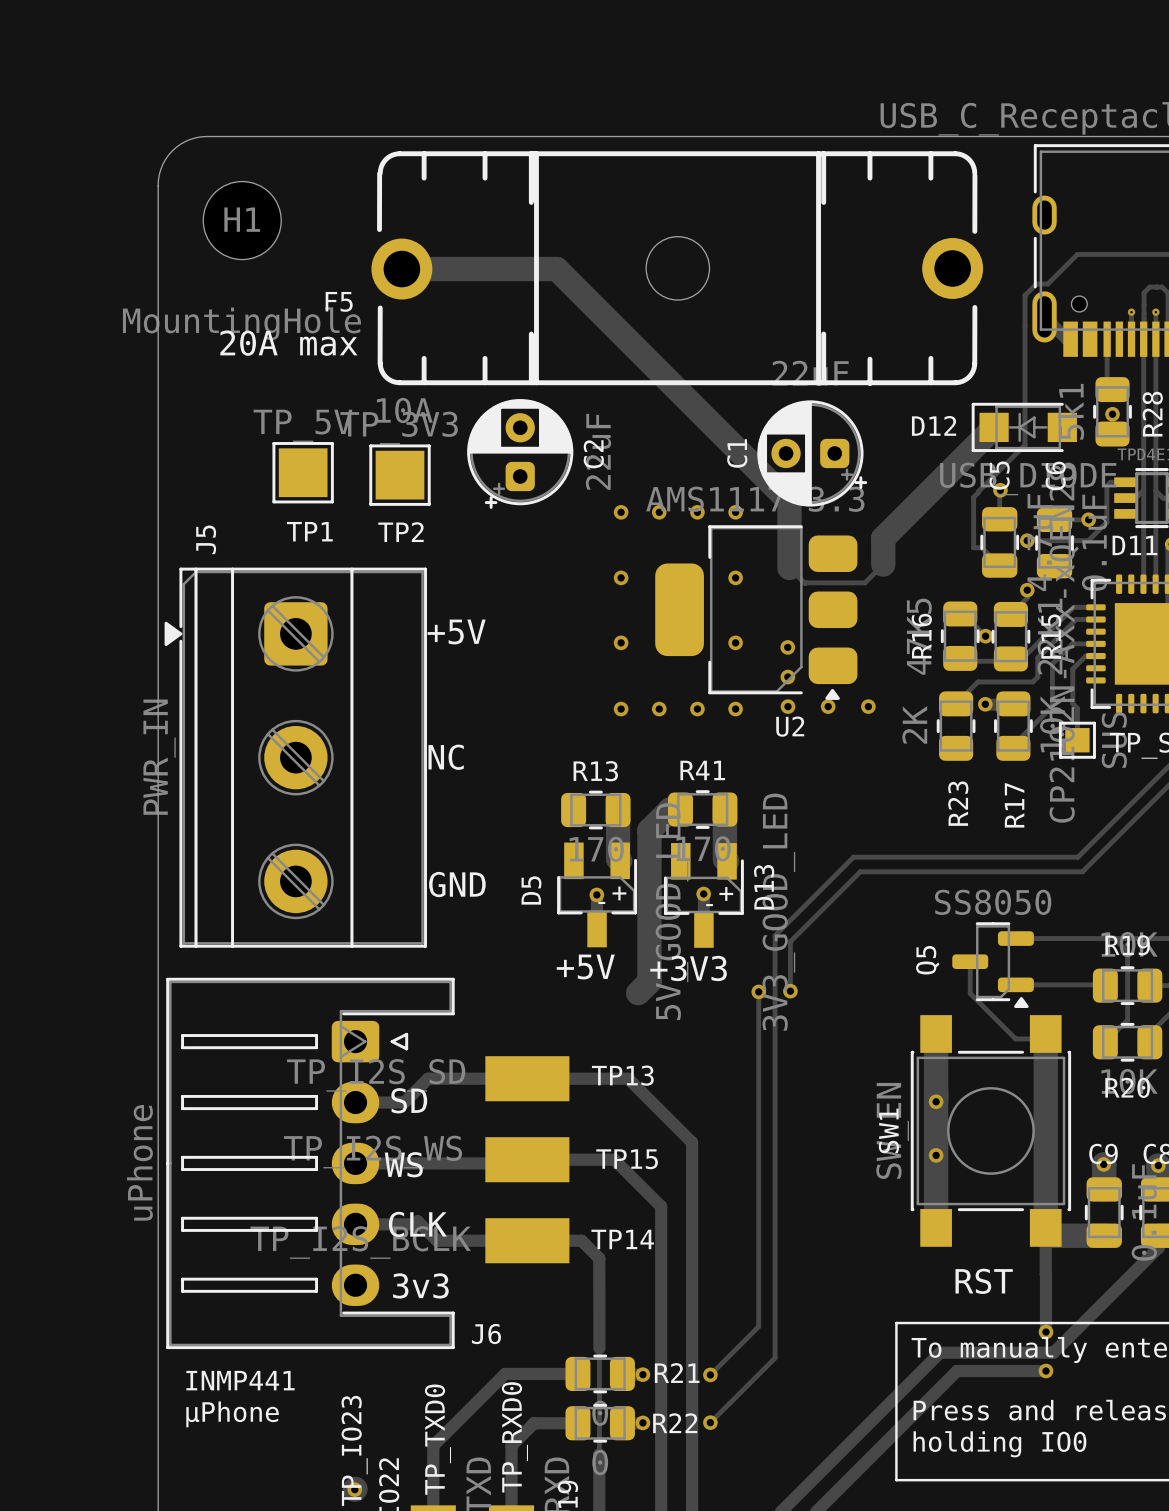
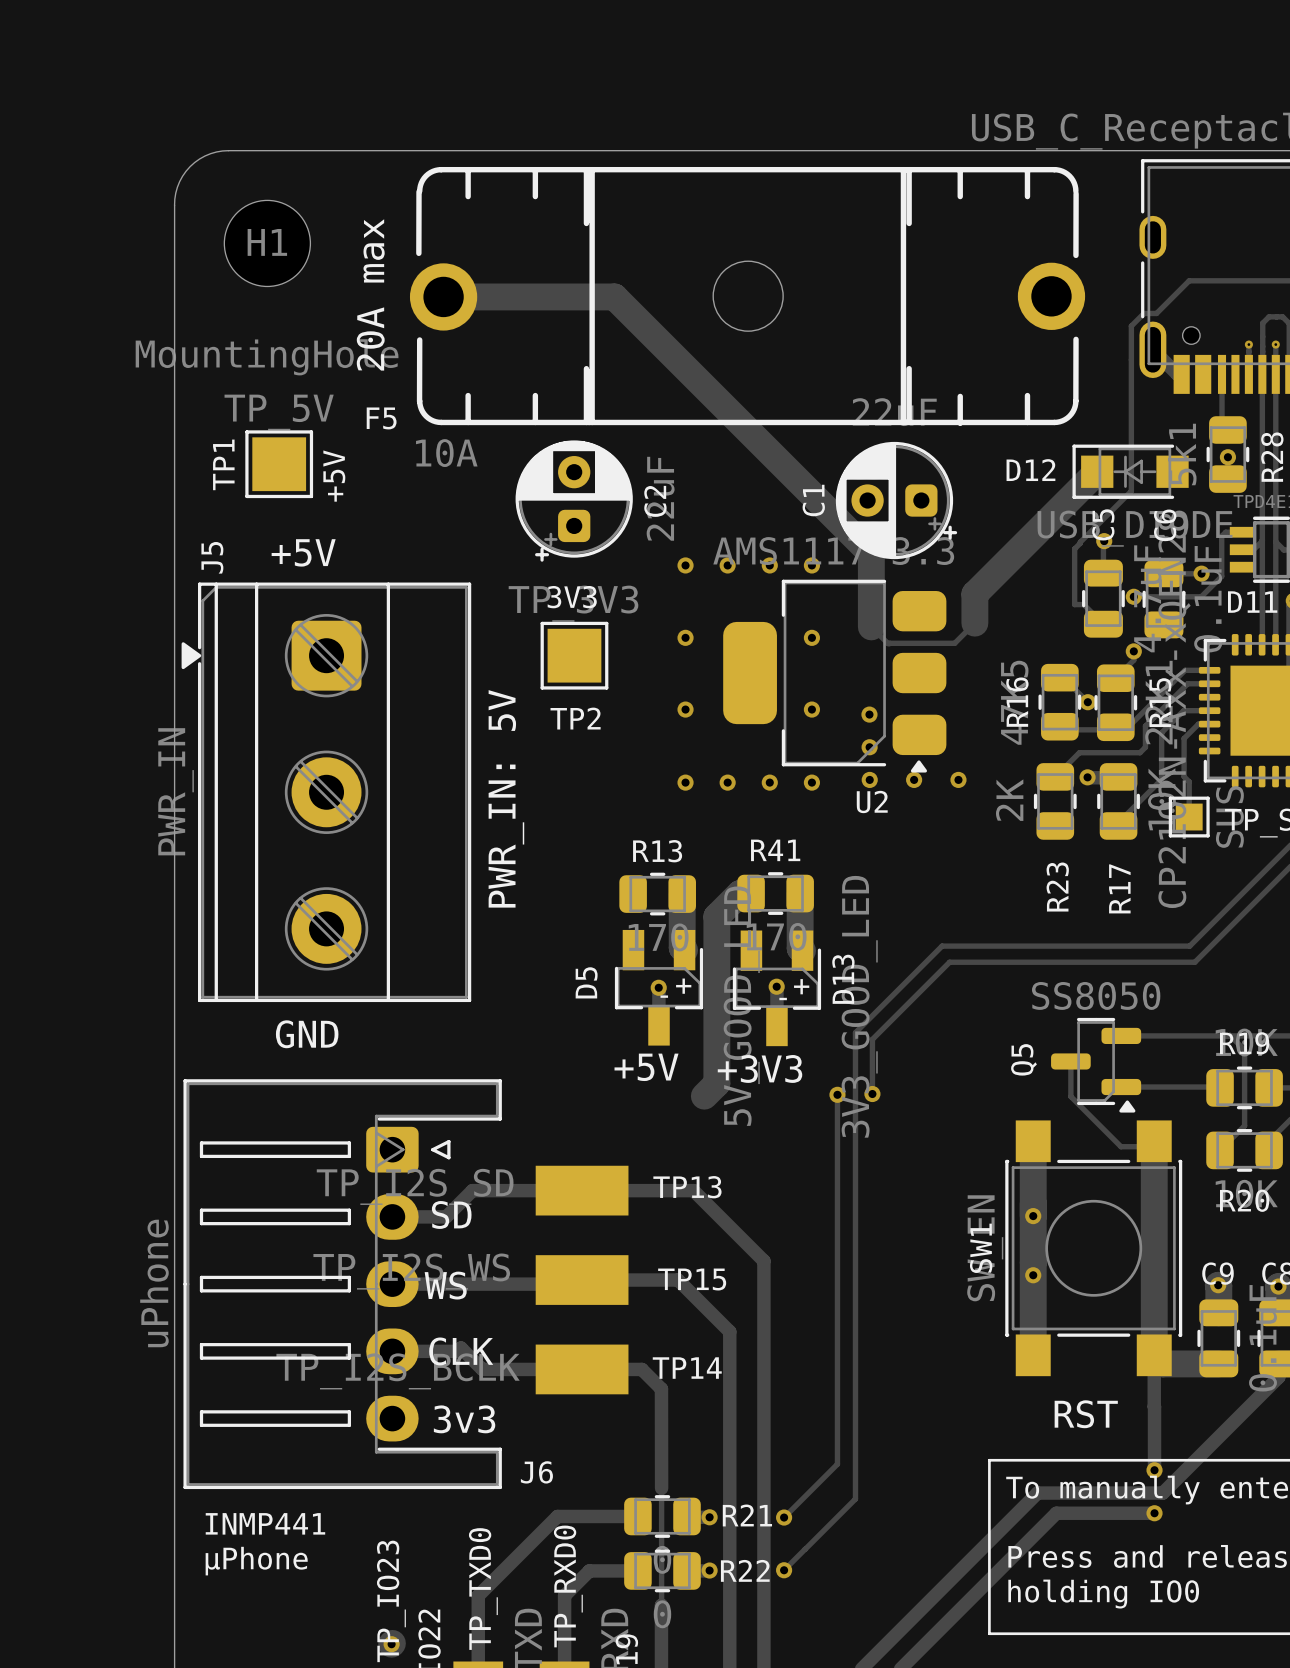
F5 name position: F5 (339, 301) -> F5 (381, 418)
text rotation: 0° (288, 343) -> 90° counterclockwise (370, 294)
text: none -> +5V (334, 476)
TP1 position: (303, 472) -> (279, 464)
TP2 position: (399, 475) -> (574, 655)
text: none -> +5V (303, 552)
TP1 name rotation: 0° (309, 531) -> 90° counterclockwise (223, 464)
TP1 name position: TP1 (309, 531) -> TP1 (223, 464)
J5 name position: J5 (206, 539) -> J5 (212, 557)
text: none -> 3V3 (572, 597)
text: +5V (456, 631) -> none
text: none -> PWR_IN: 5V (506, 798)
J5 position: (295, 757) -> (326, 792)
text: NC (446, 757) -> none
text position: GND (457, 884) -> GND (307, 1034)

